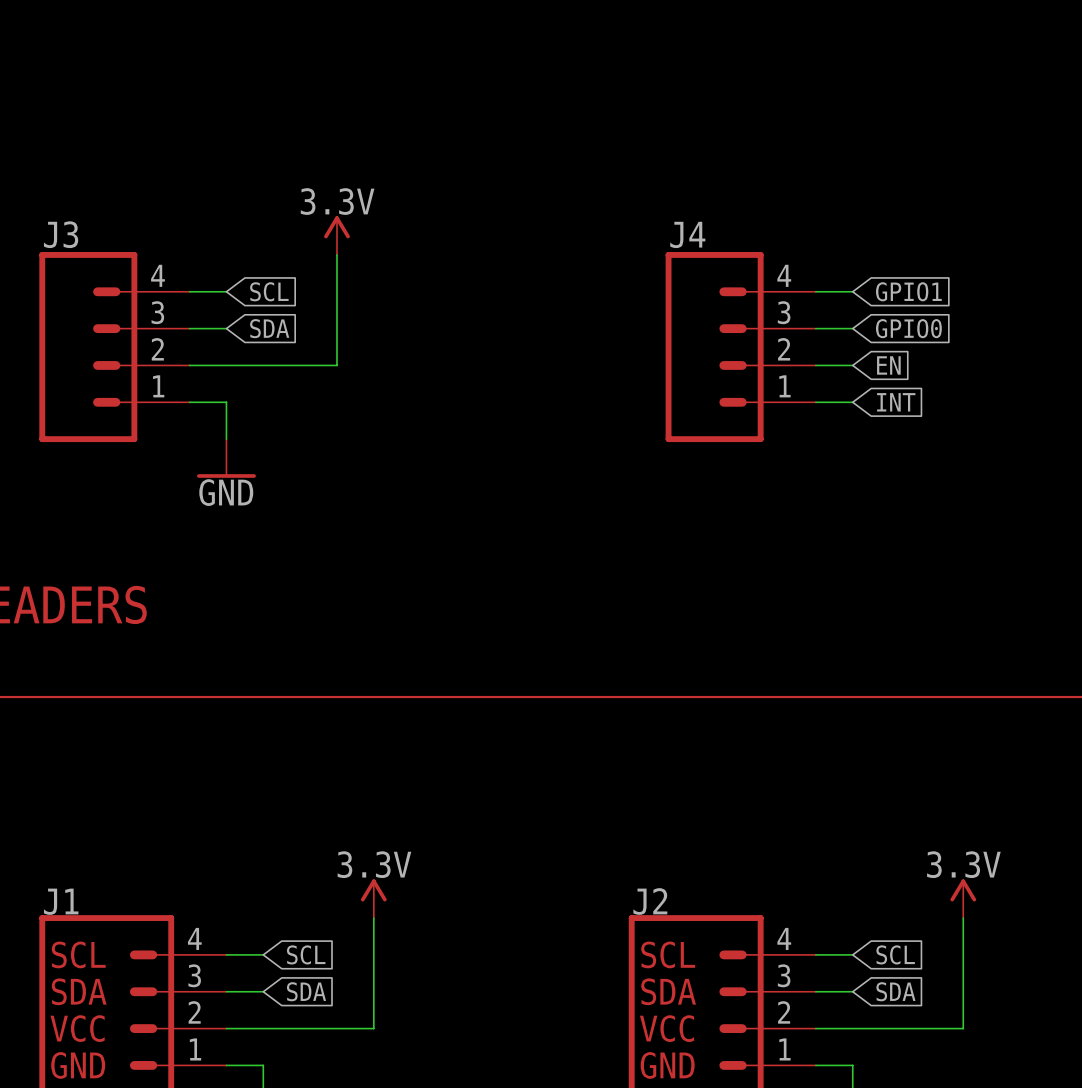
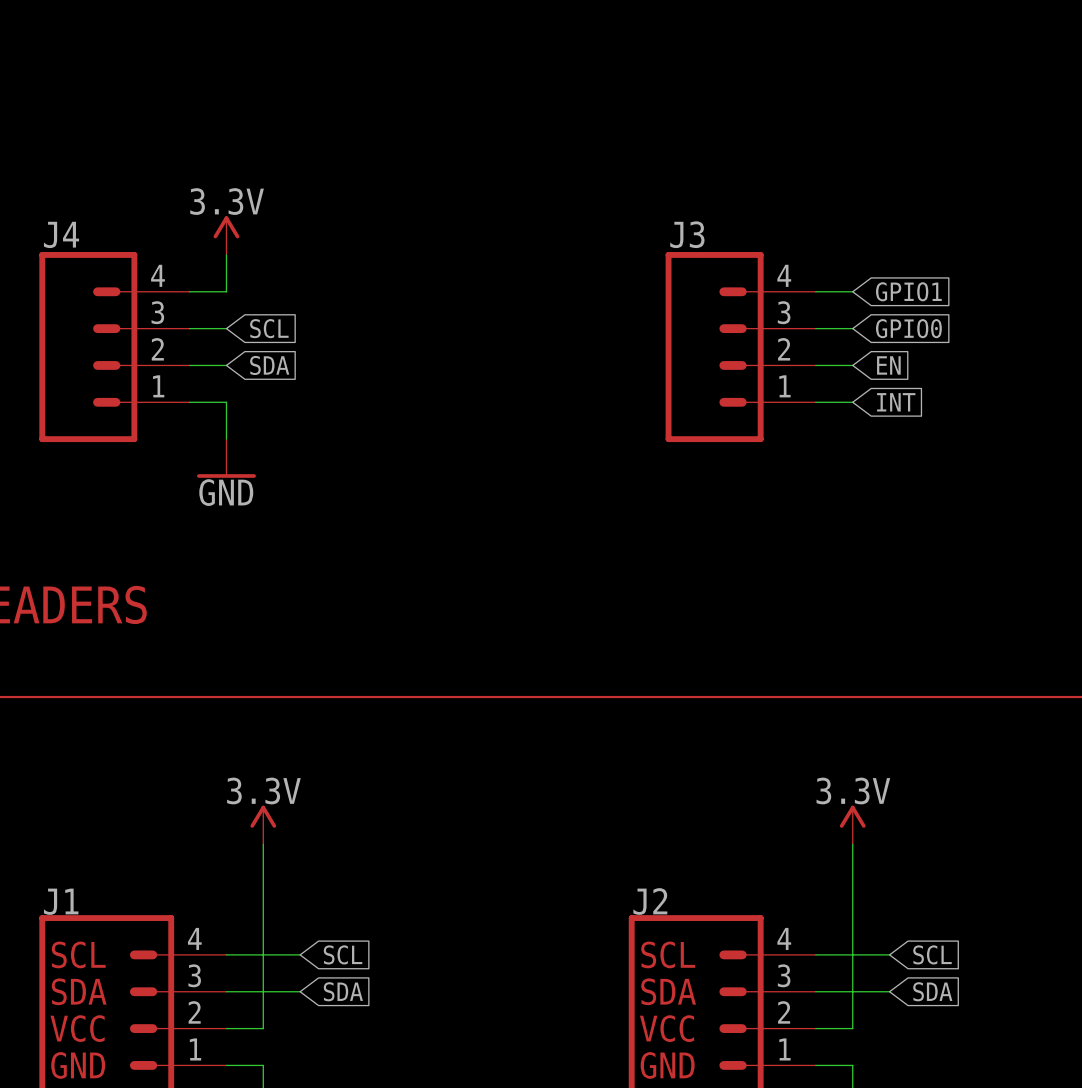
J3 name: J3 (61, 234) -> J4 (61, 234)
J4 name: J4 (687, 234) -> J3 (687, 234)
power symbol position: 3.3V (336, 235) -> 3.3V (226, 235)
wire: none -> (226, 254) (226, 291)
wire: (336, 254) (336, 365) (226, 365) -> none
global label: SCL (269, 291) -> none
global label: SDA (269, 328) -> SCL (269, 328)
global label: none -> SDA (269, 365)
power symbol position: 3.3V (373, 898) -> 3.3V (263, 825)
power symbol position: 3.3V (963, 898) -> 3.3V (852, 825)
wire: (373, 918) (373, 1028) (263, 1028) -> (263, 844) (263, 1028)
wire: (963, 918) (963, 1028) (852, 1028) -> (852, 844) (852, 1028)
wire: none -> (263, 954) (300, 954)
global label position: SCL (306, 954) -> SCL (343, 954)
wire: none -> (852, 954) (889, 954)
global label position: SCL (895, 954) -> SCL (932, 954)
wire: none -> (263, 991) (300, 991)
global label position: SDA (306, 991) -> SDA (343, 991)
wire: none -> (852, 991) (889, 991)
global label position: SDA (895, 991) -> SDA (932, 991)

